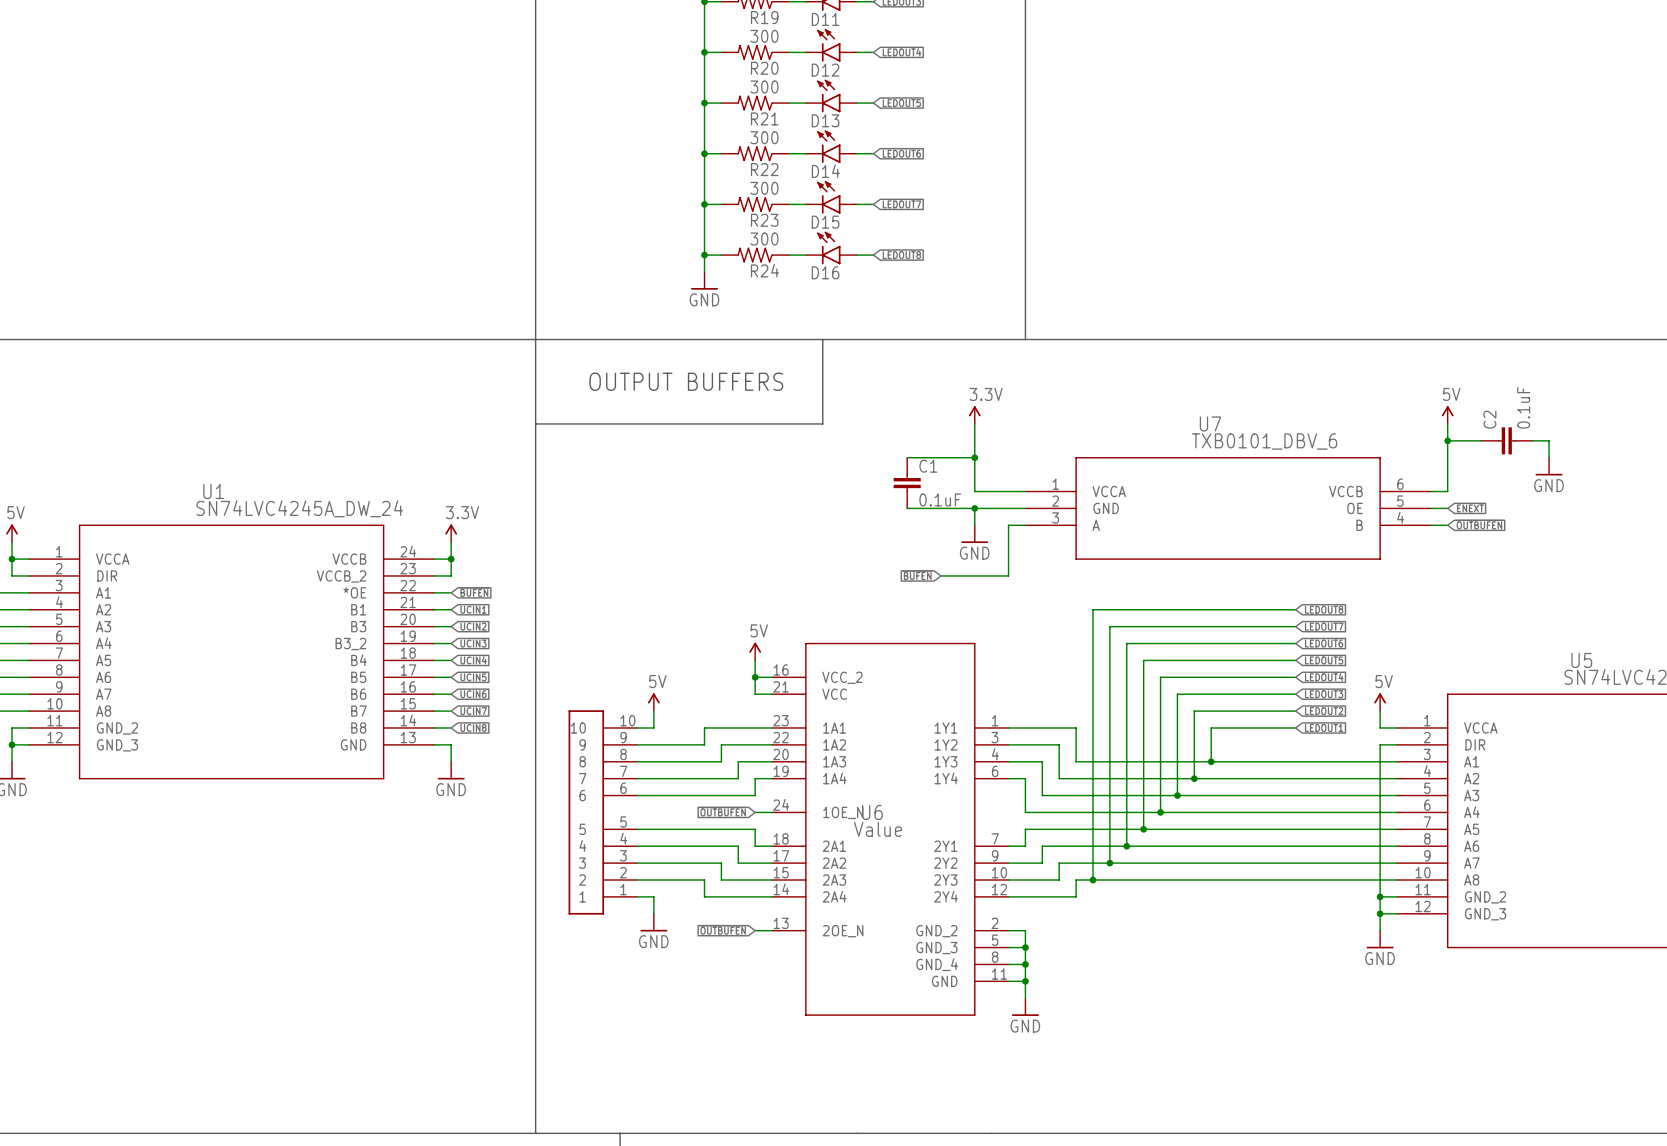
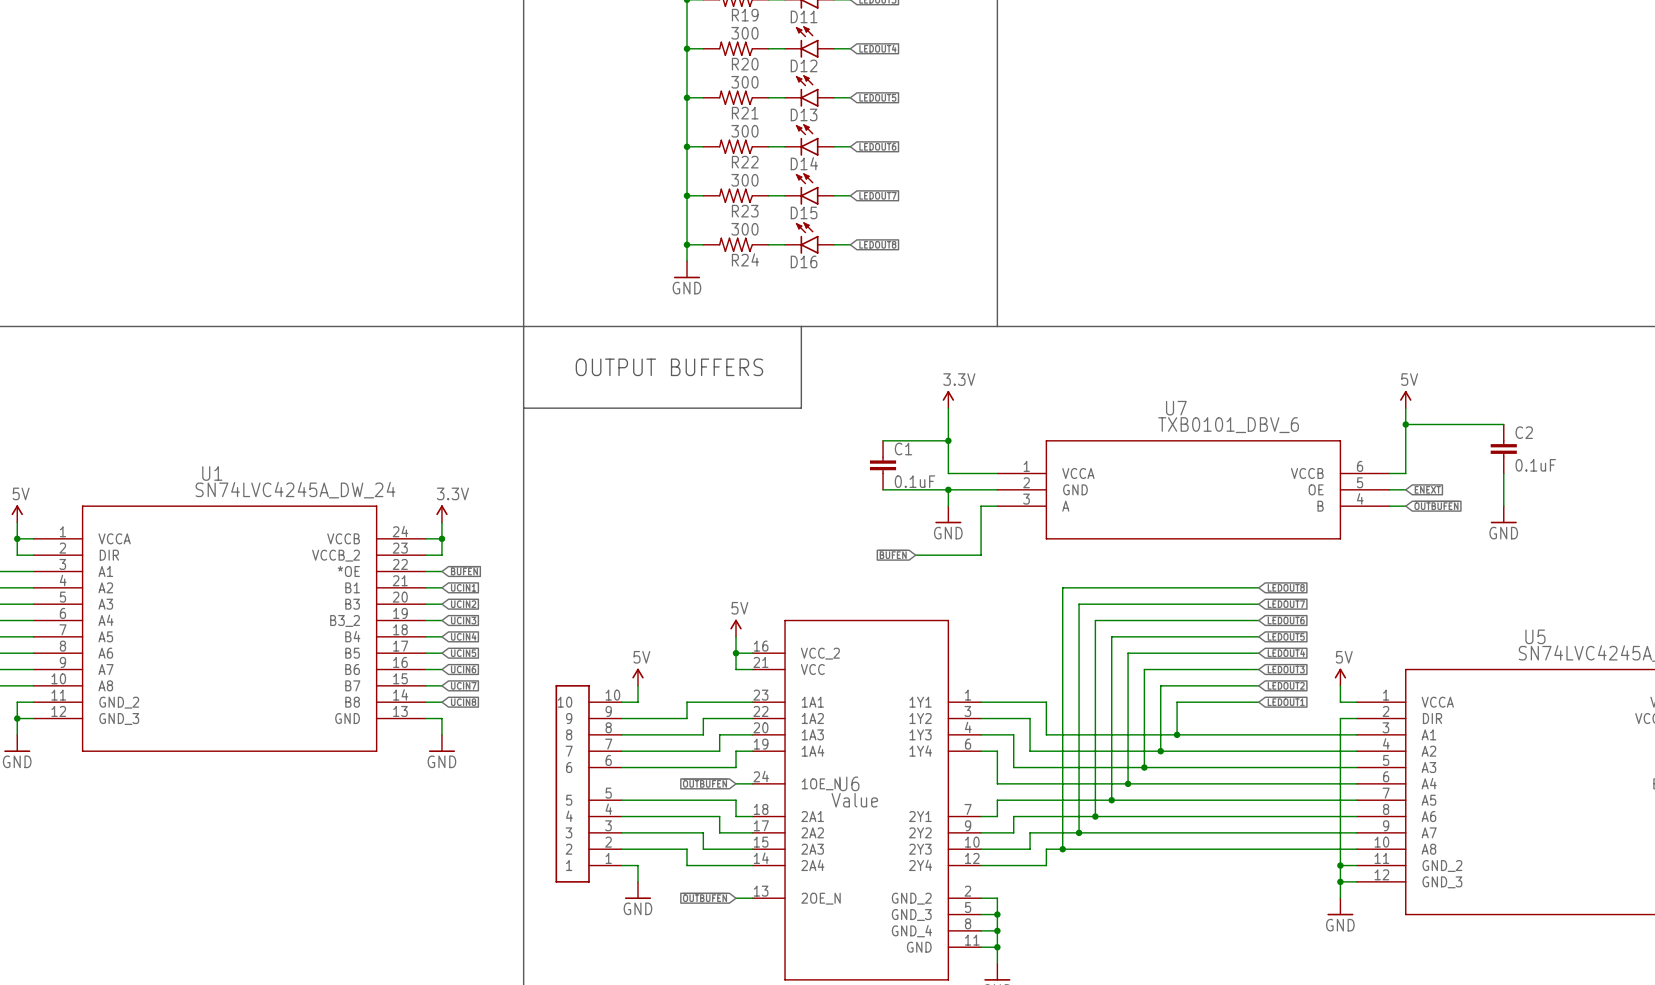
C2 rotation: 0° (1506, 440) -> 90° clockwise (1503, 448)
C2 position: (1506, 440) -> (1503, 448)
power symbol position: GND (1549, 466) -> GND (1503, 514)
wire: none -> (1503, 473) (1503, 506)

